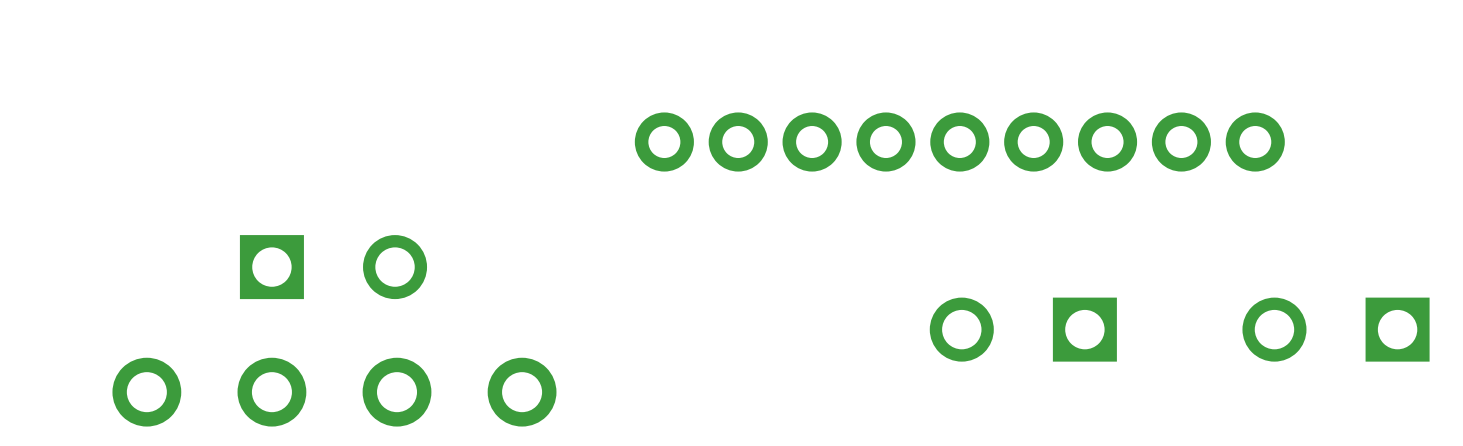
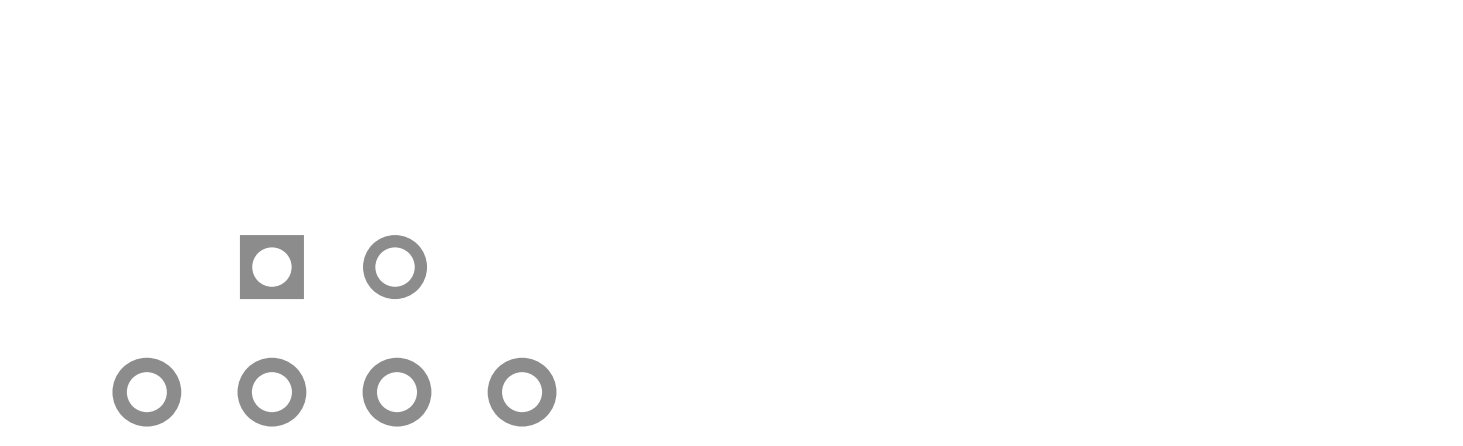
part: (959, 142) -> none
part: (1023, 329) -> none
part: (1336, 329) -> none

